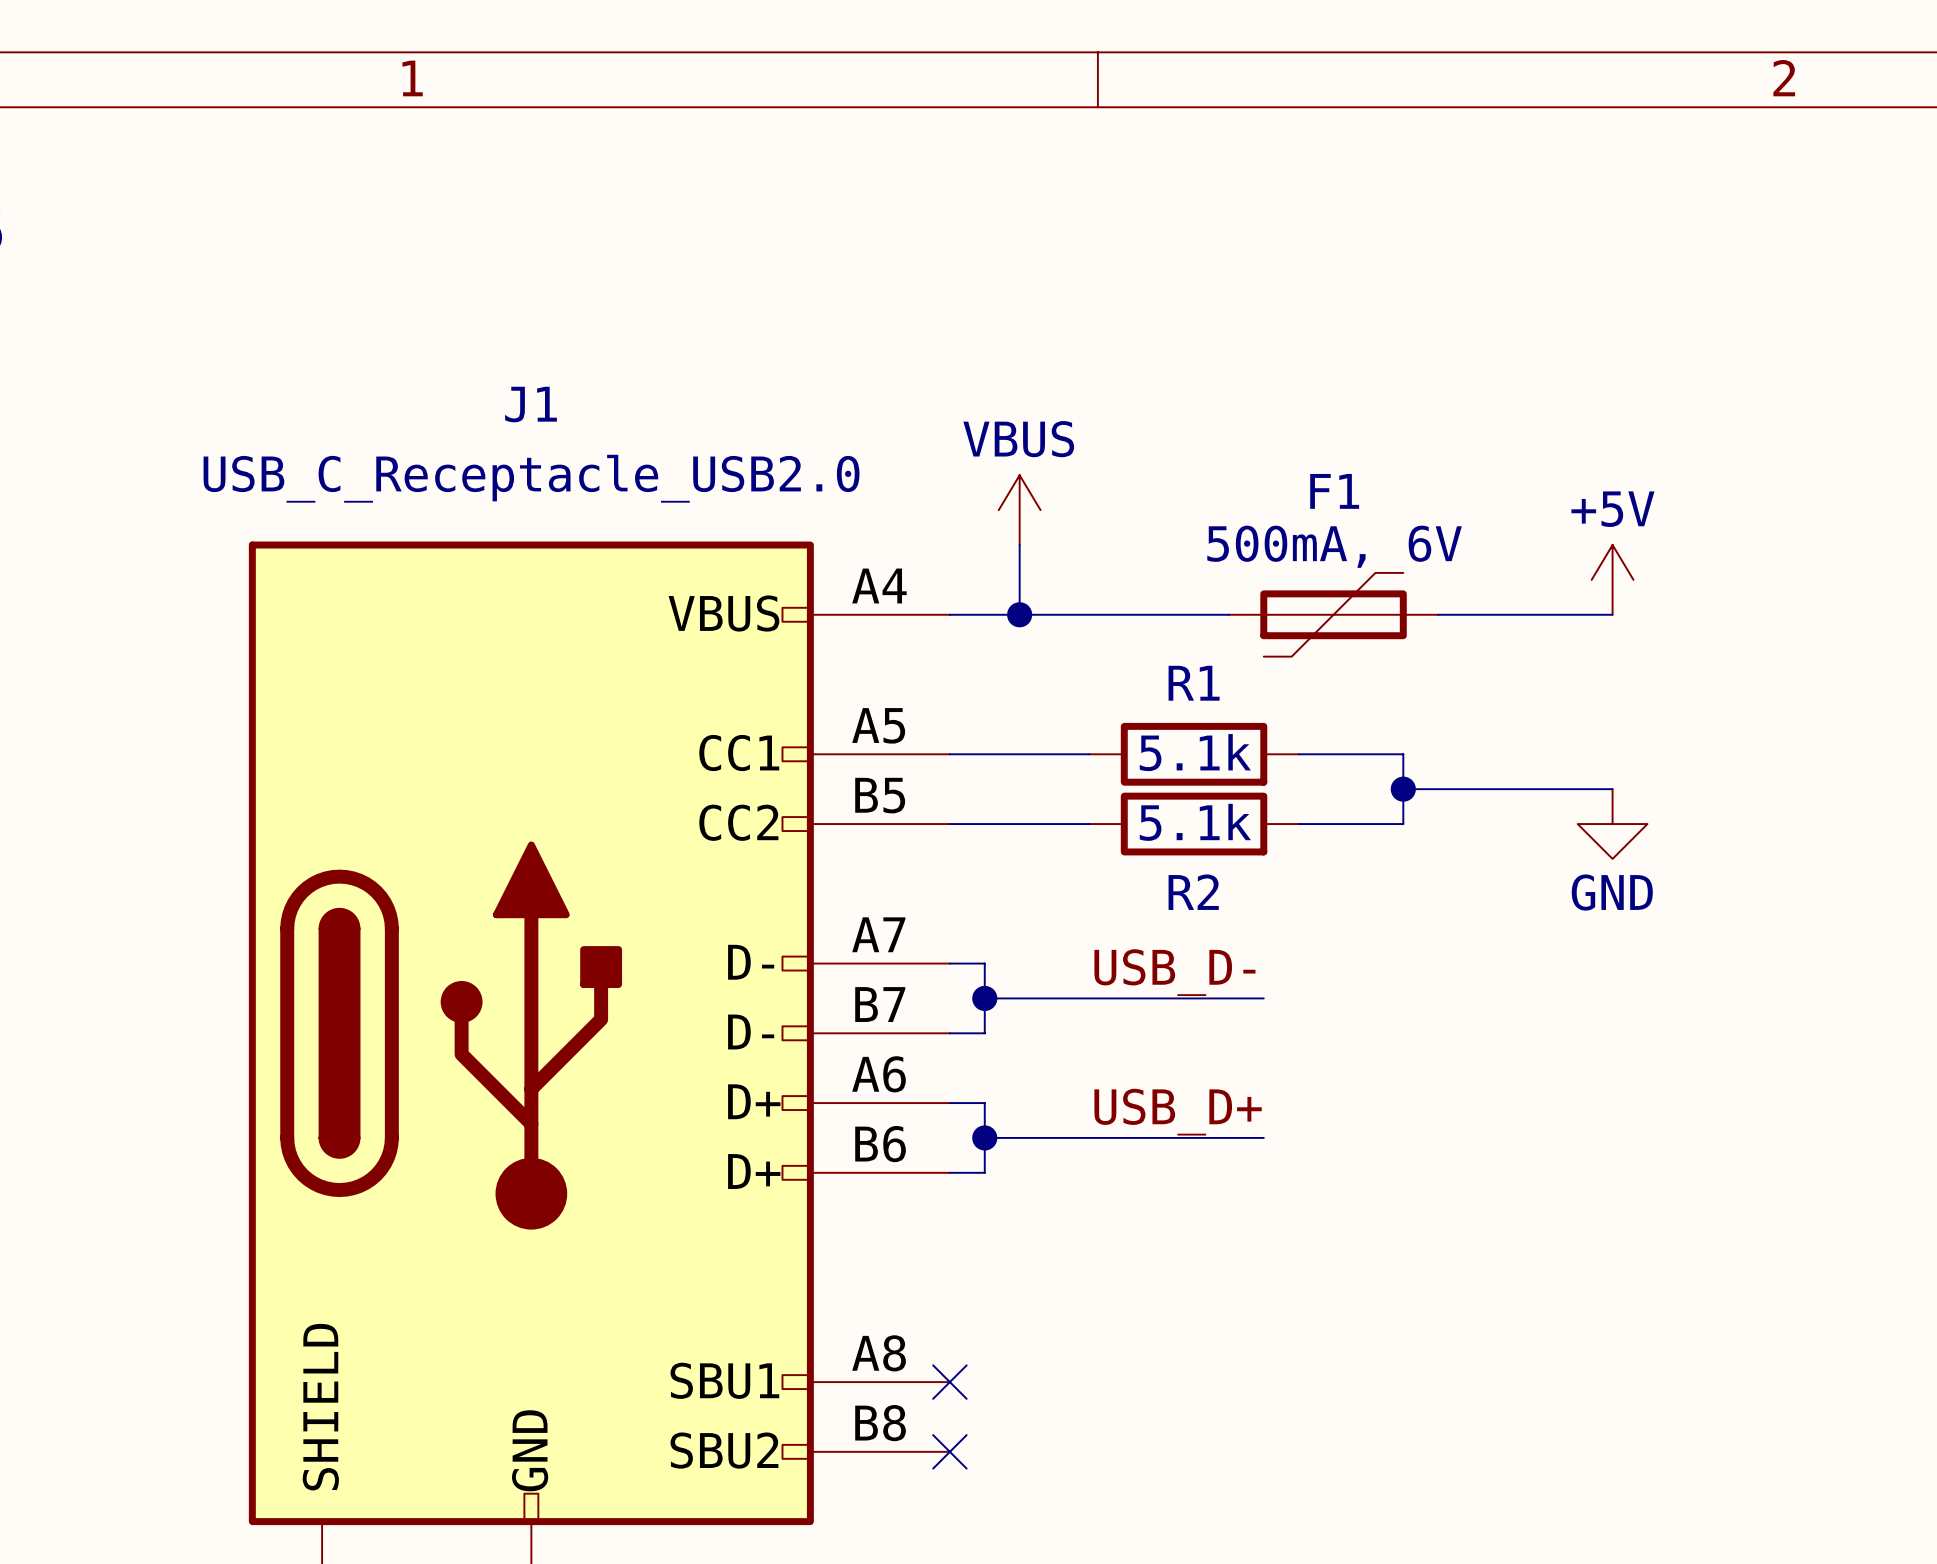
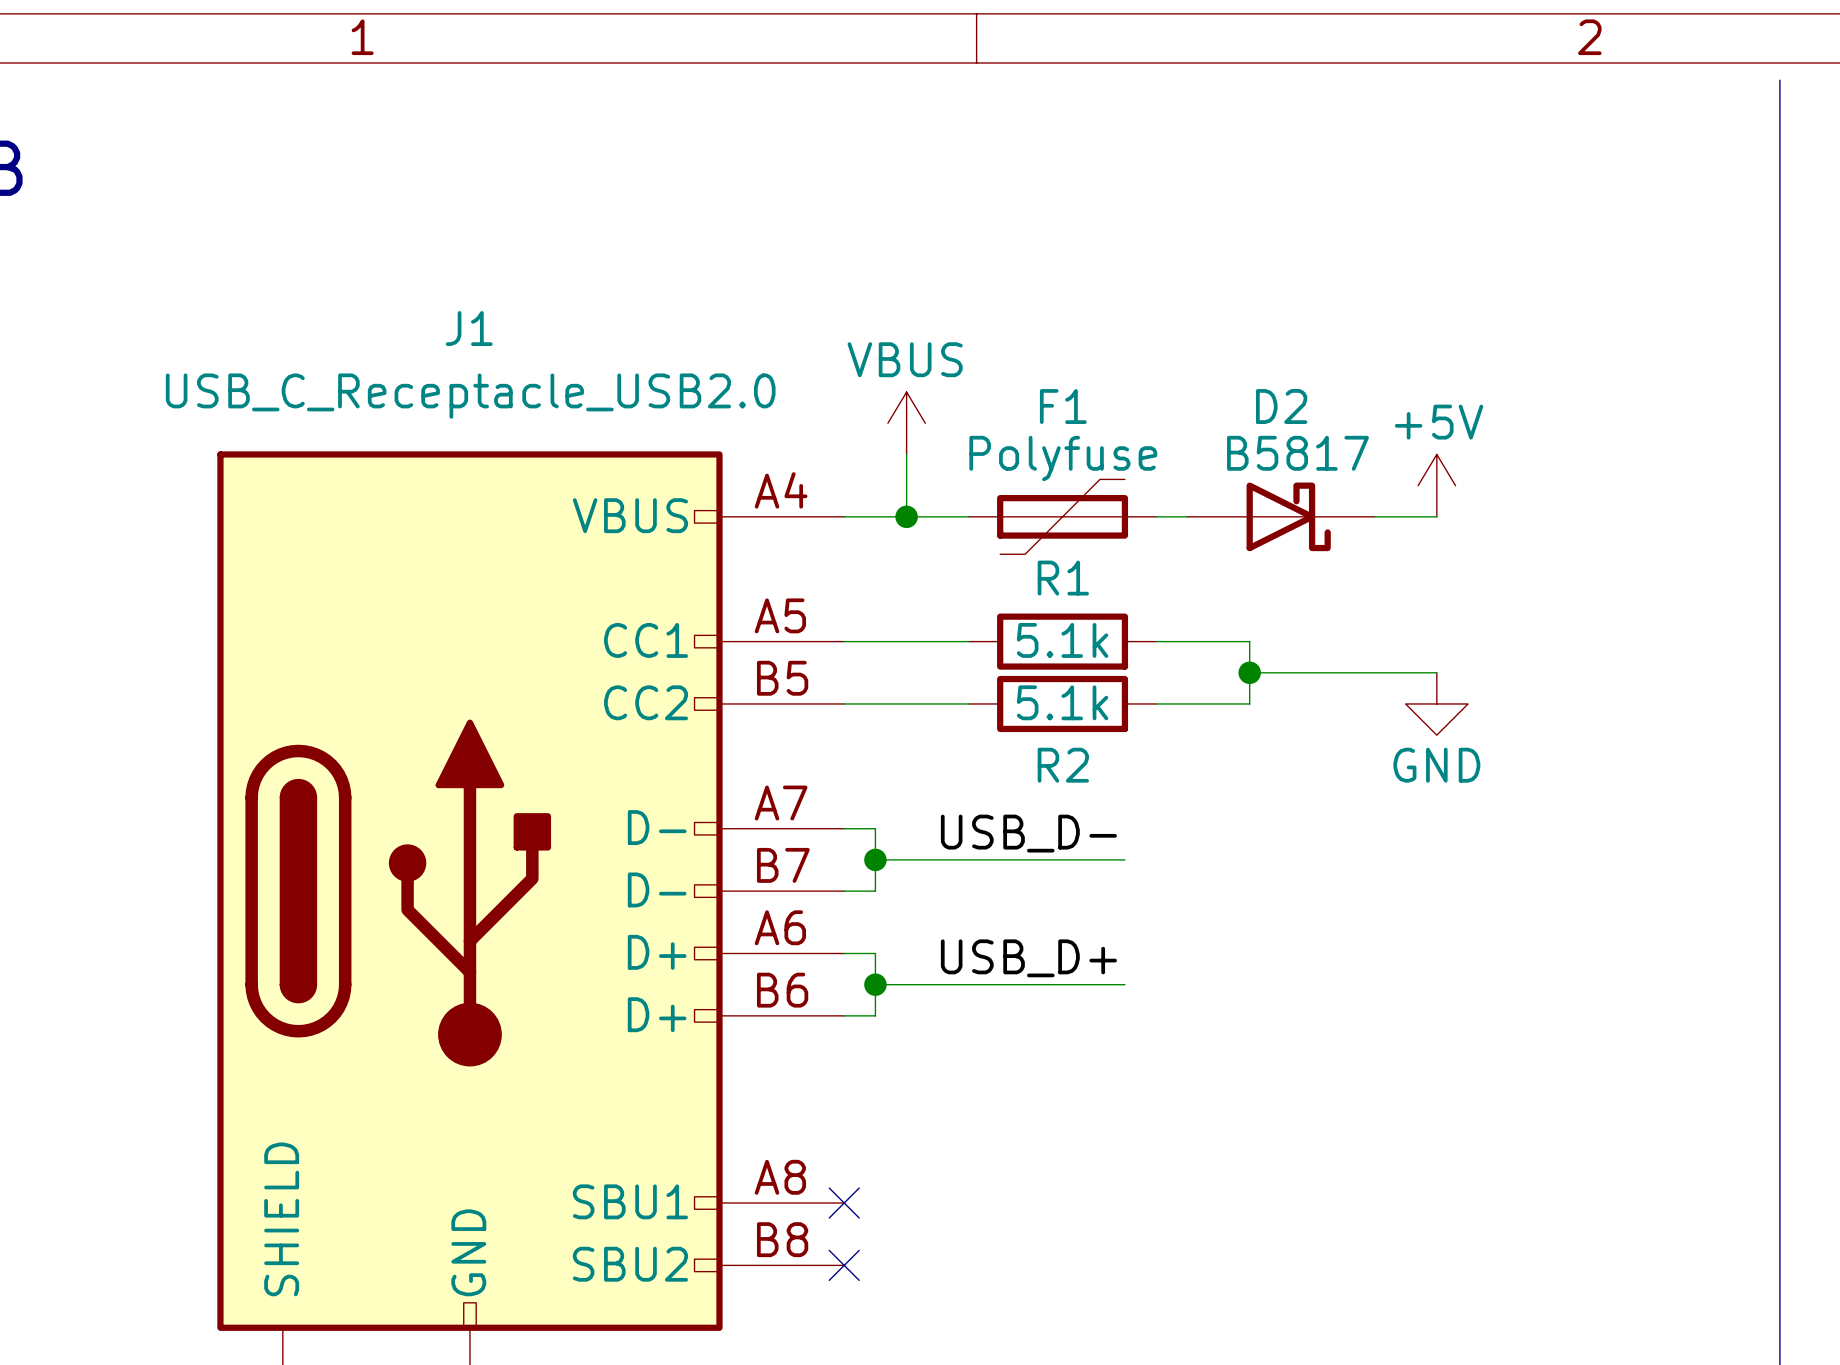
F1 value: 500mA, 6V (1334, 546) -> Polyfuse (1063, 458)
F1 position: (1333, 614) -> (1062, 516)
D2: none -> B5817 (1280, 516)

